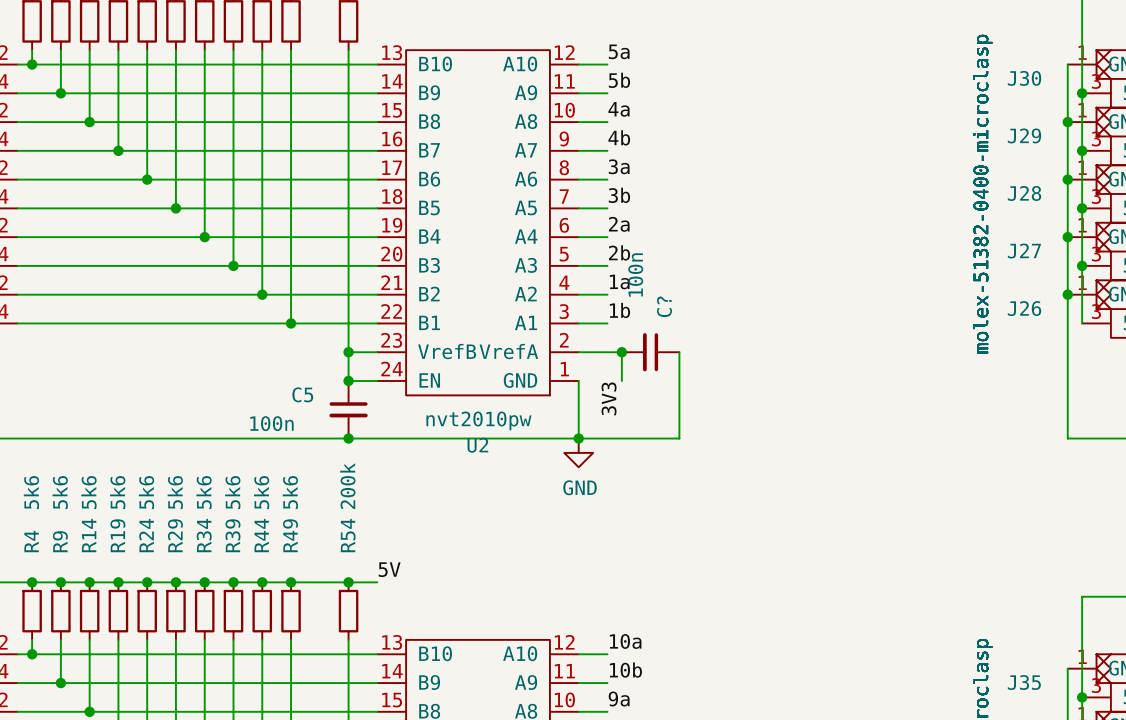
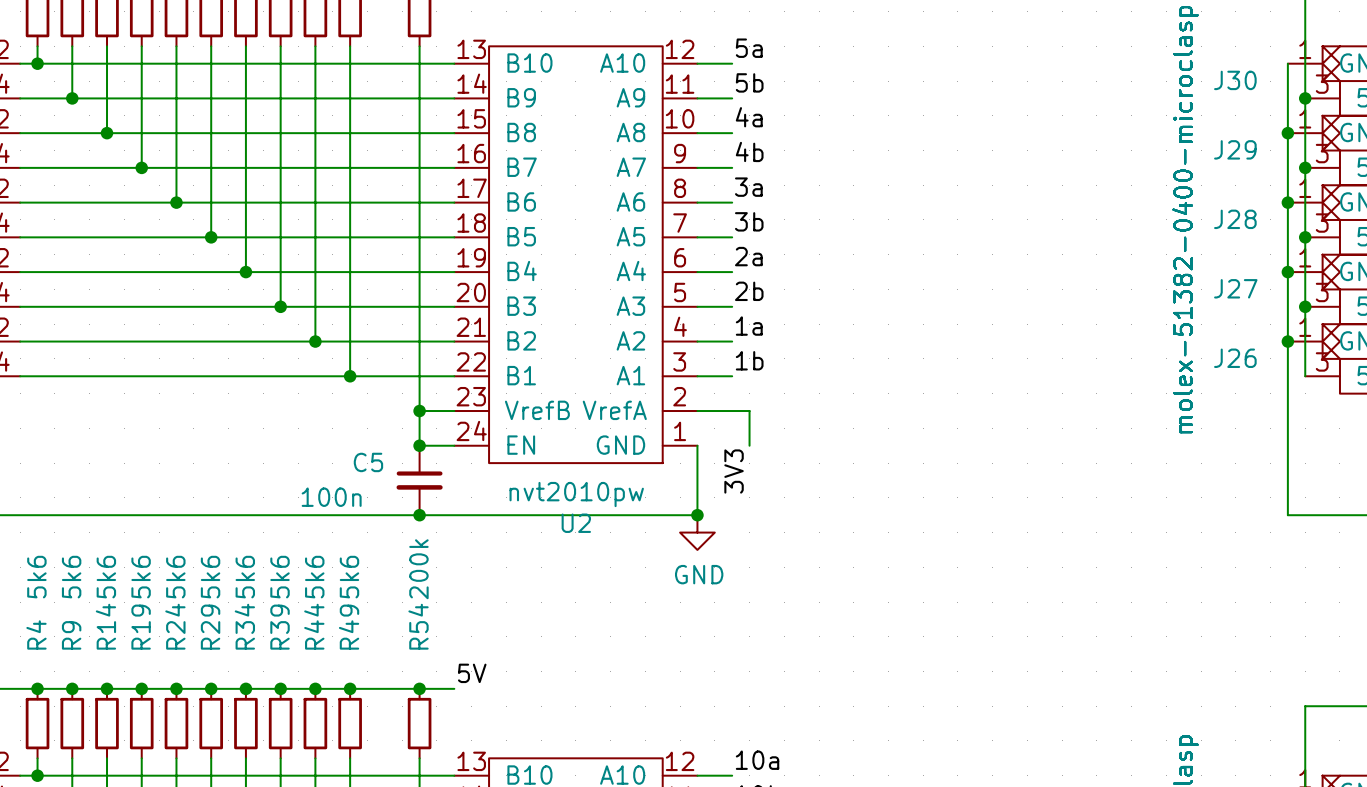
junction: (621, 352) -> none
C?: 100n (650, 352) -> none
wire: (679, 352) (679, 438) (578, 438) -> none

